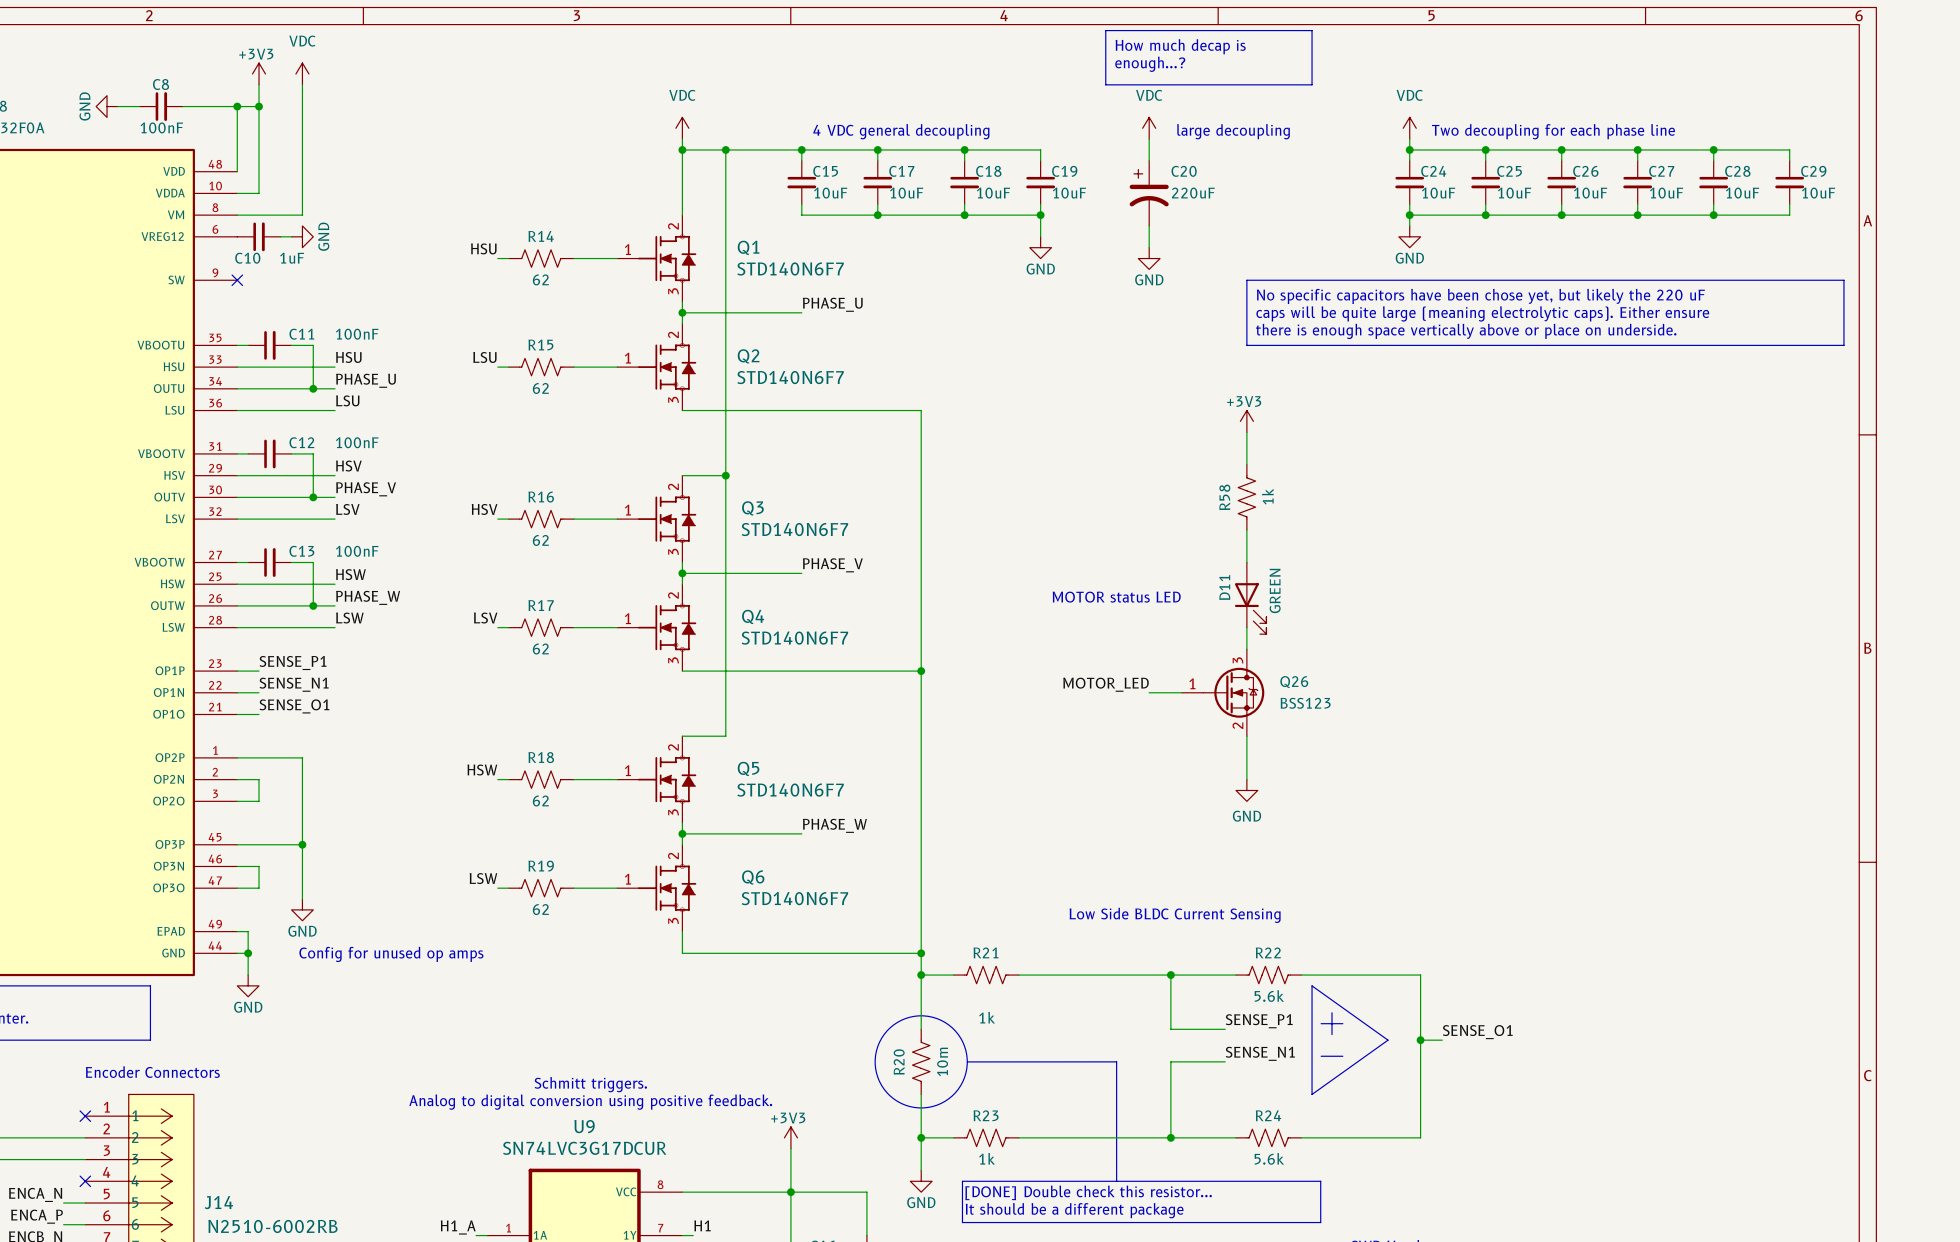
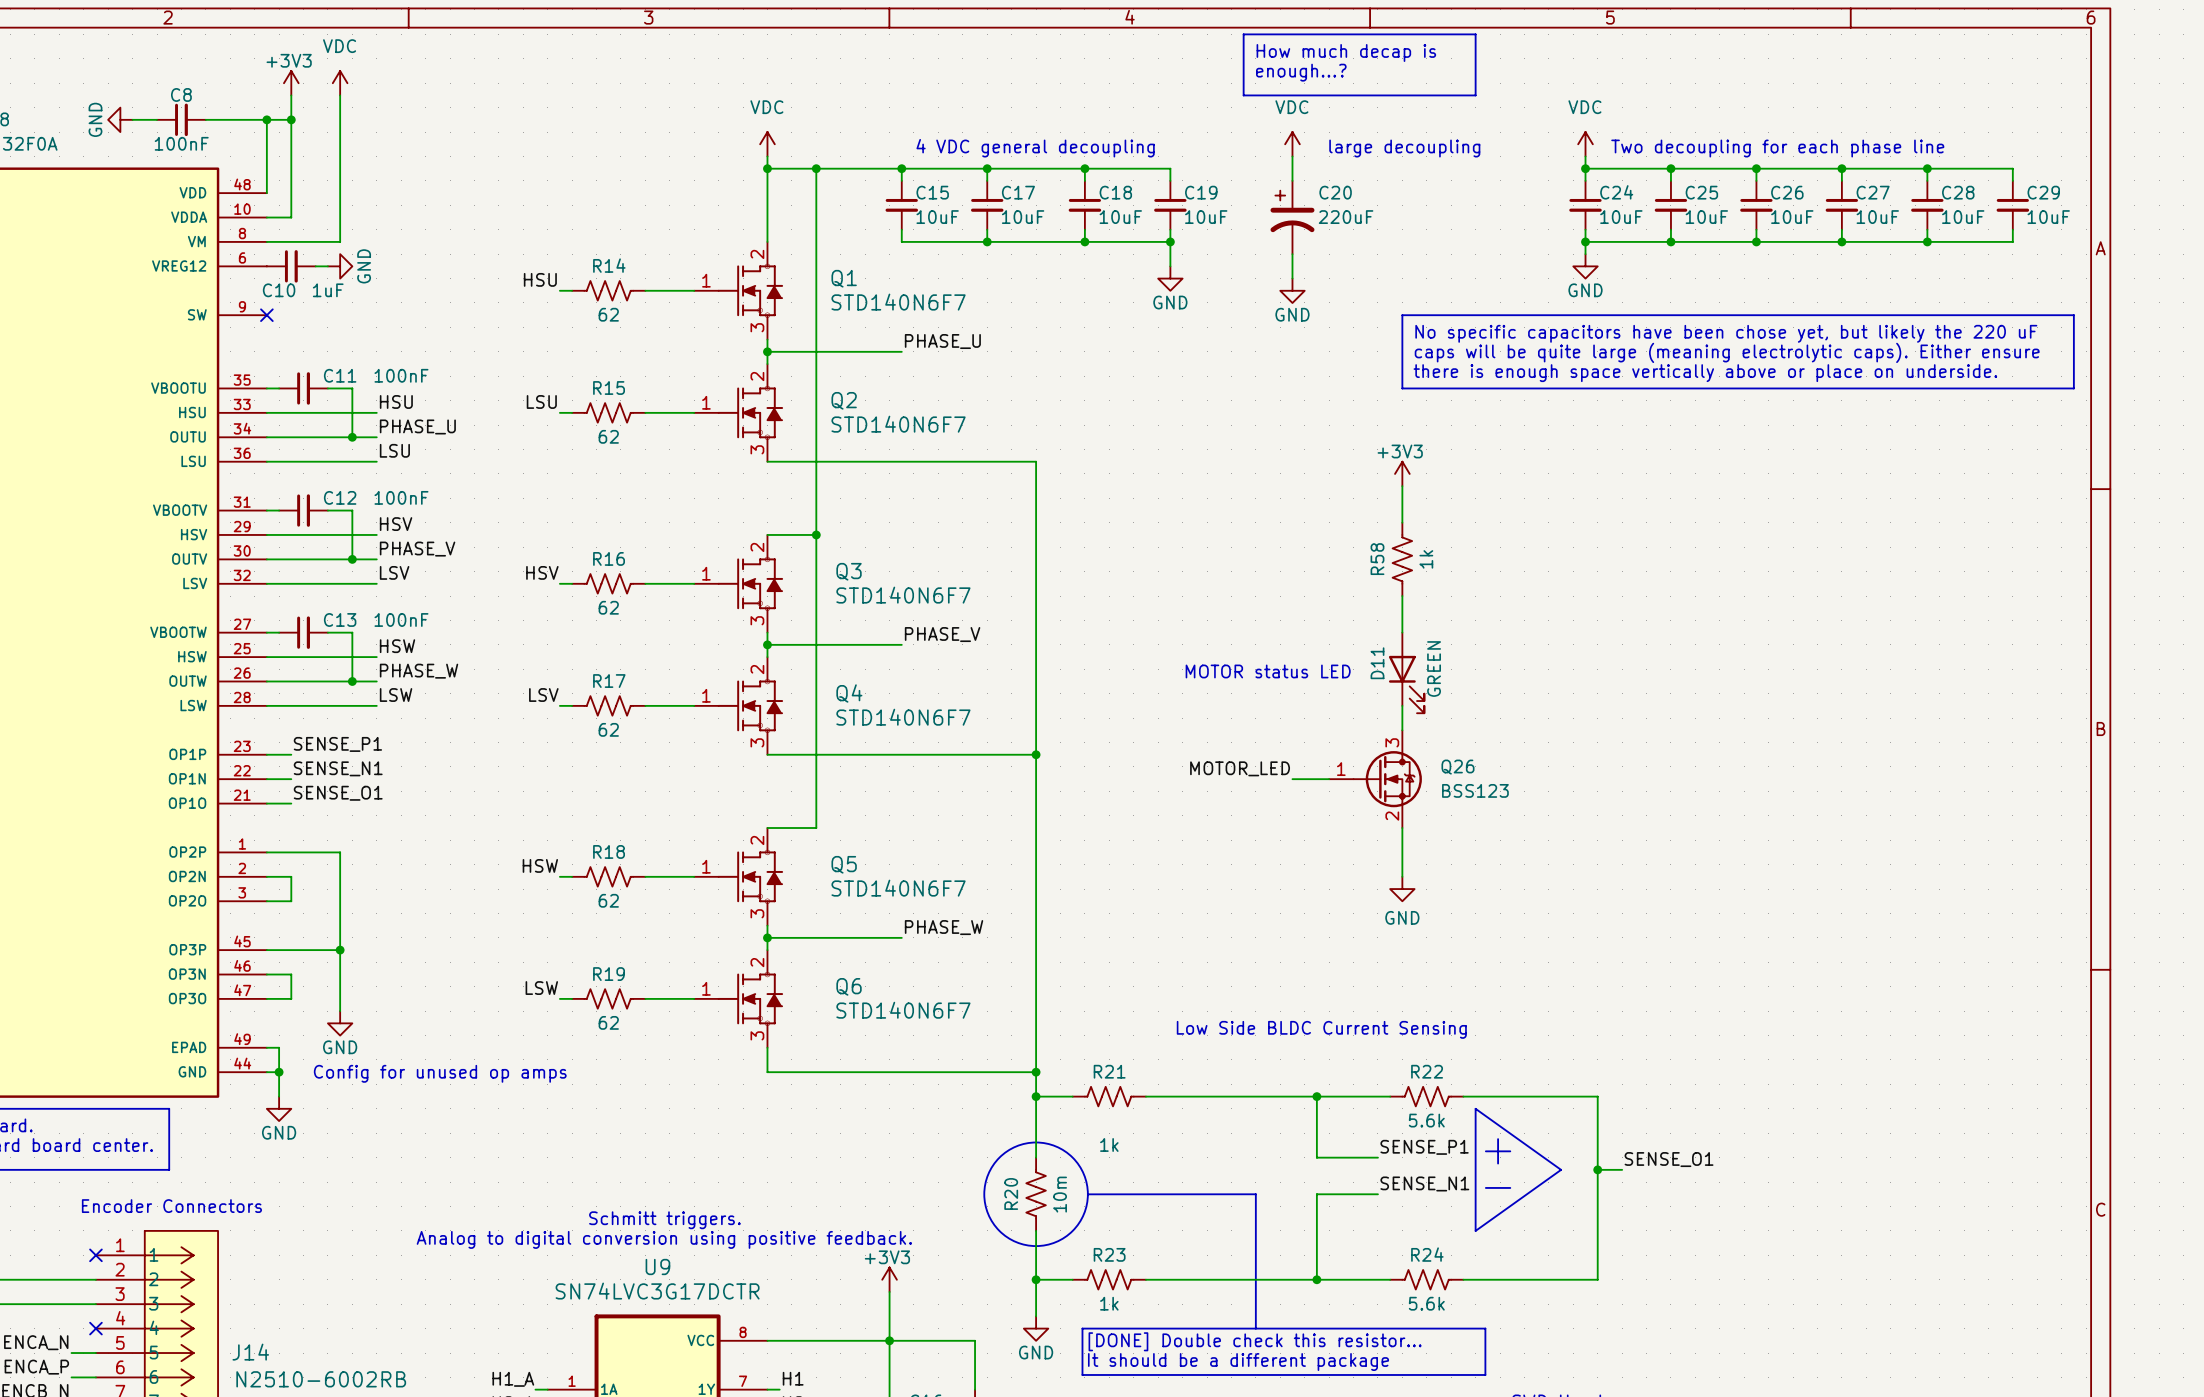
U9 value: SN74LVC3G17DCUR (584, 1148) -> SN74LVC3G17DCTR (657, 1291)

